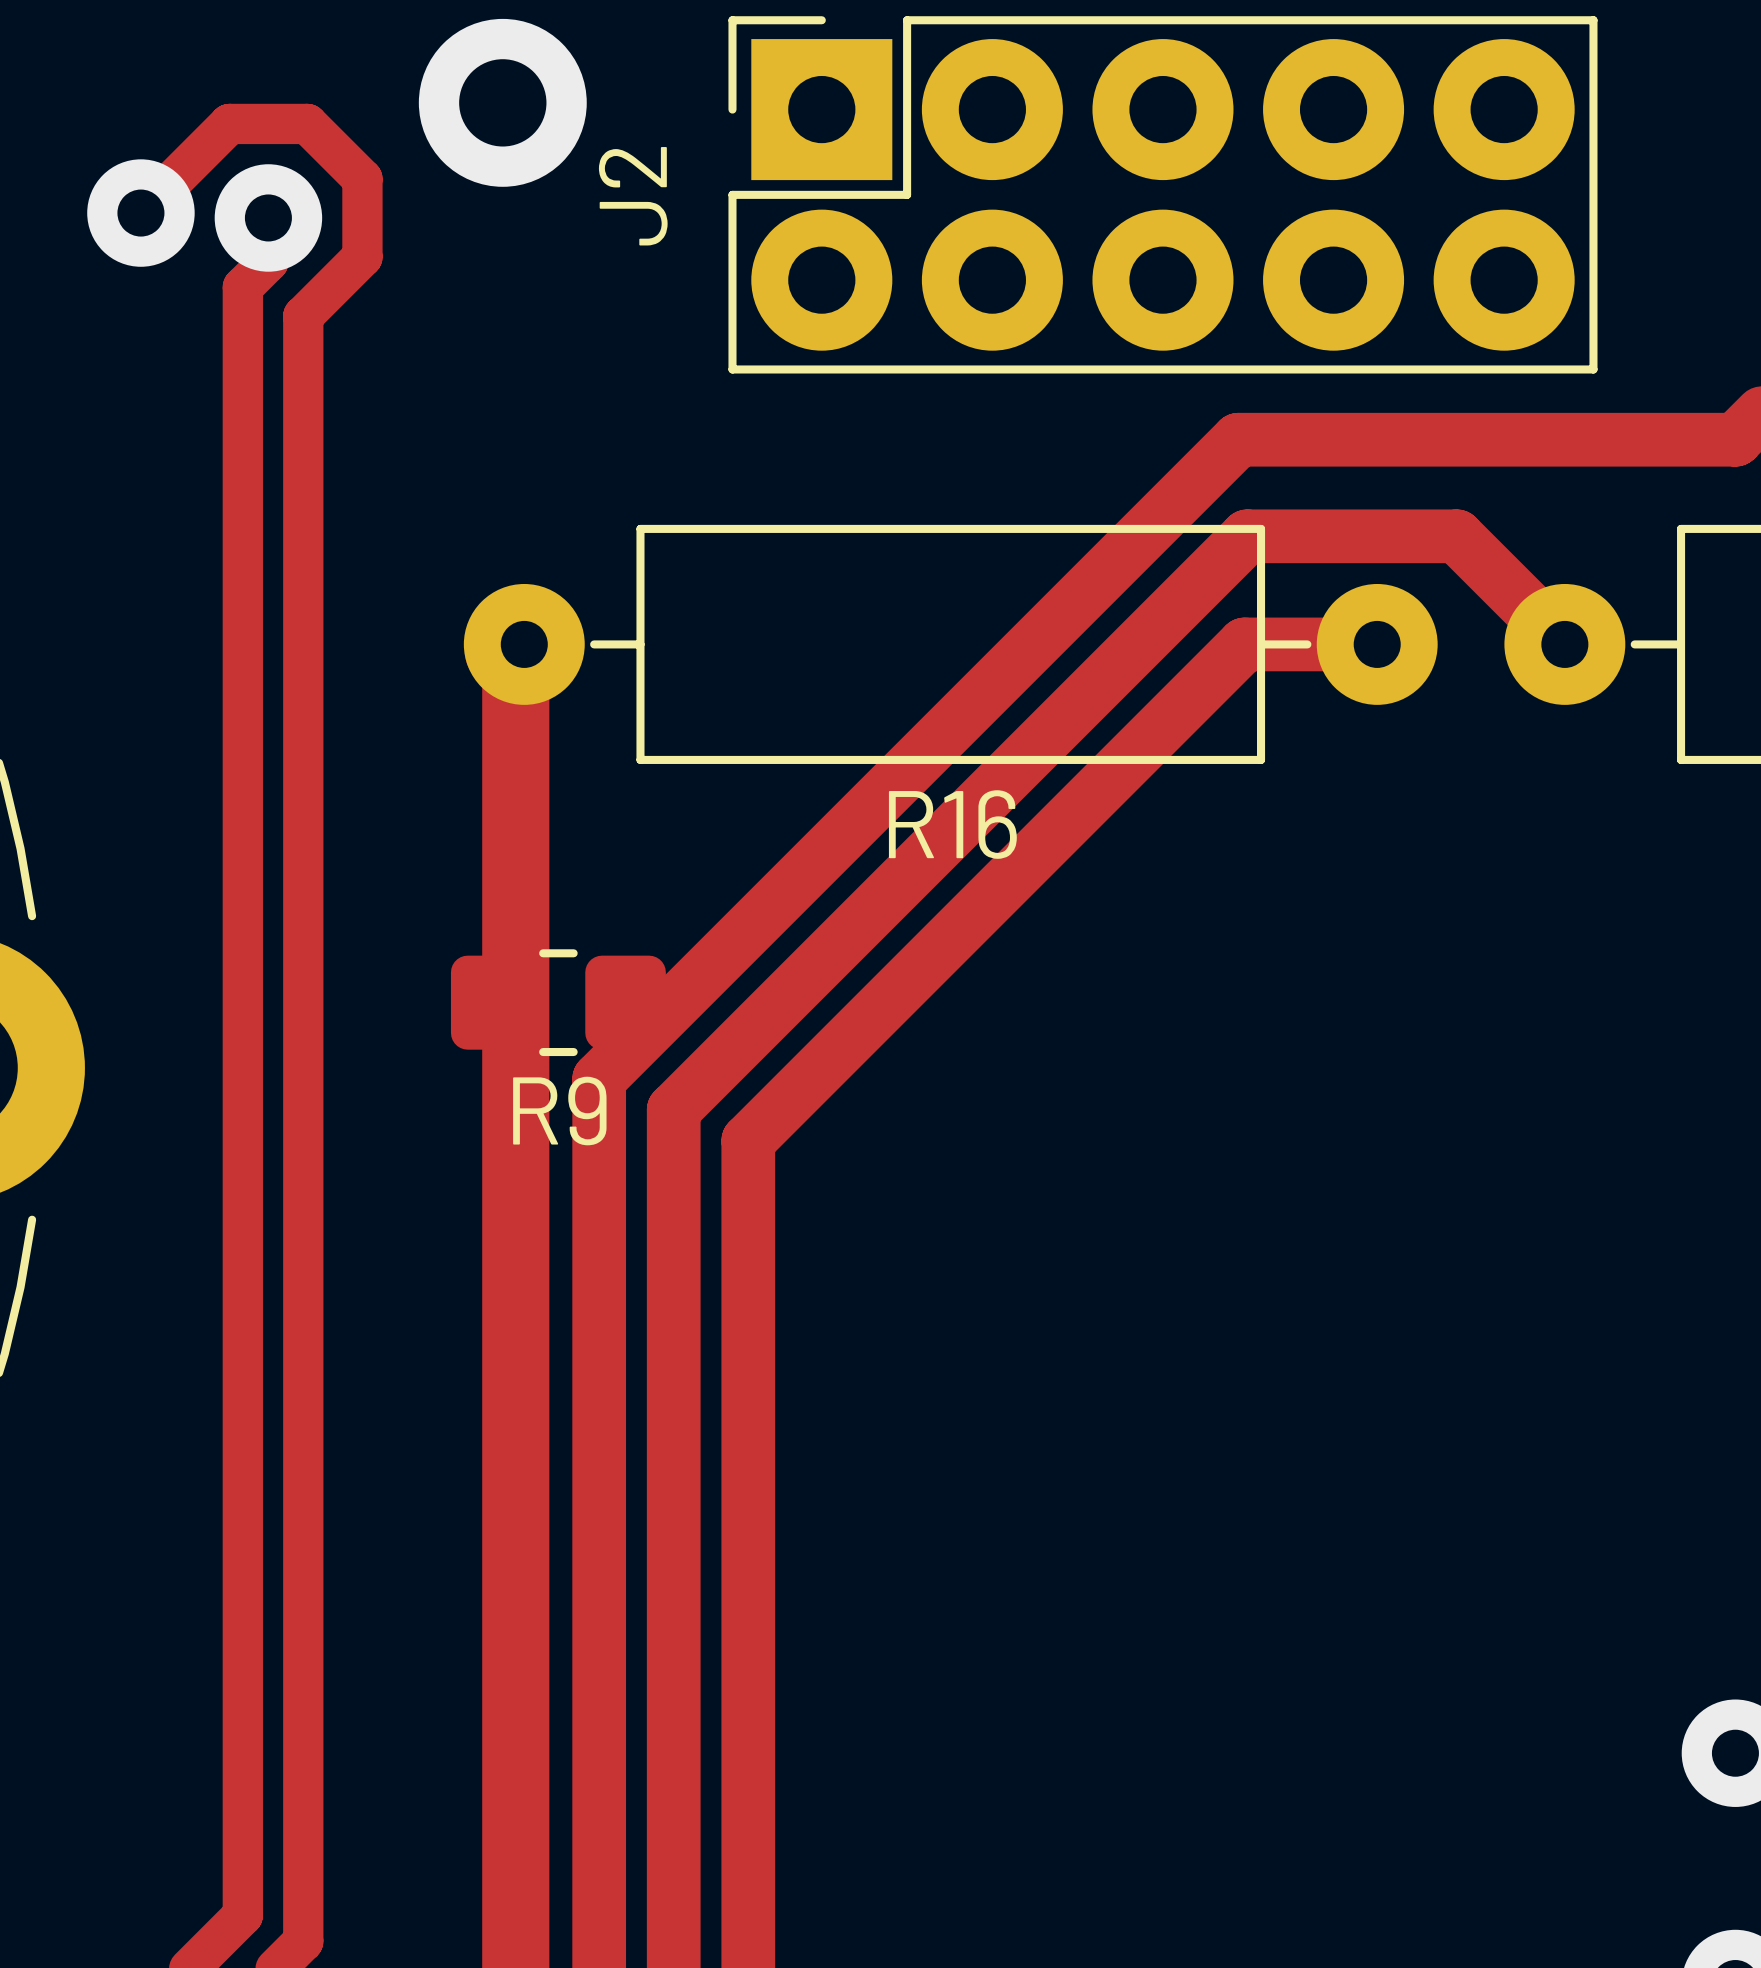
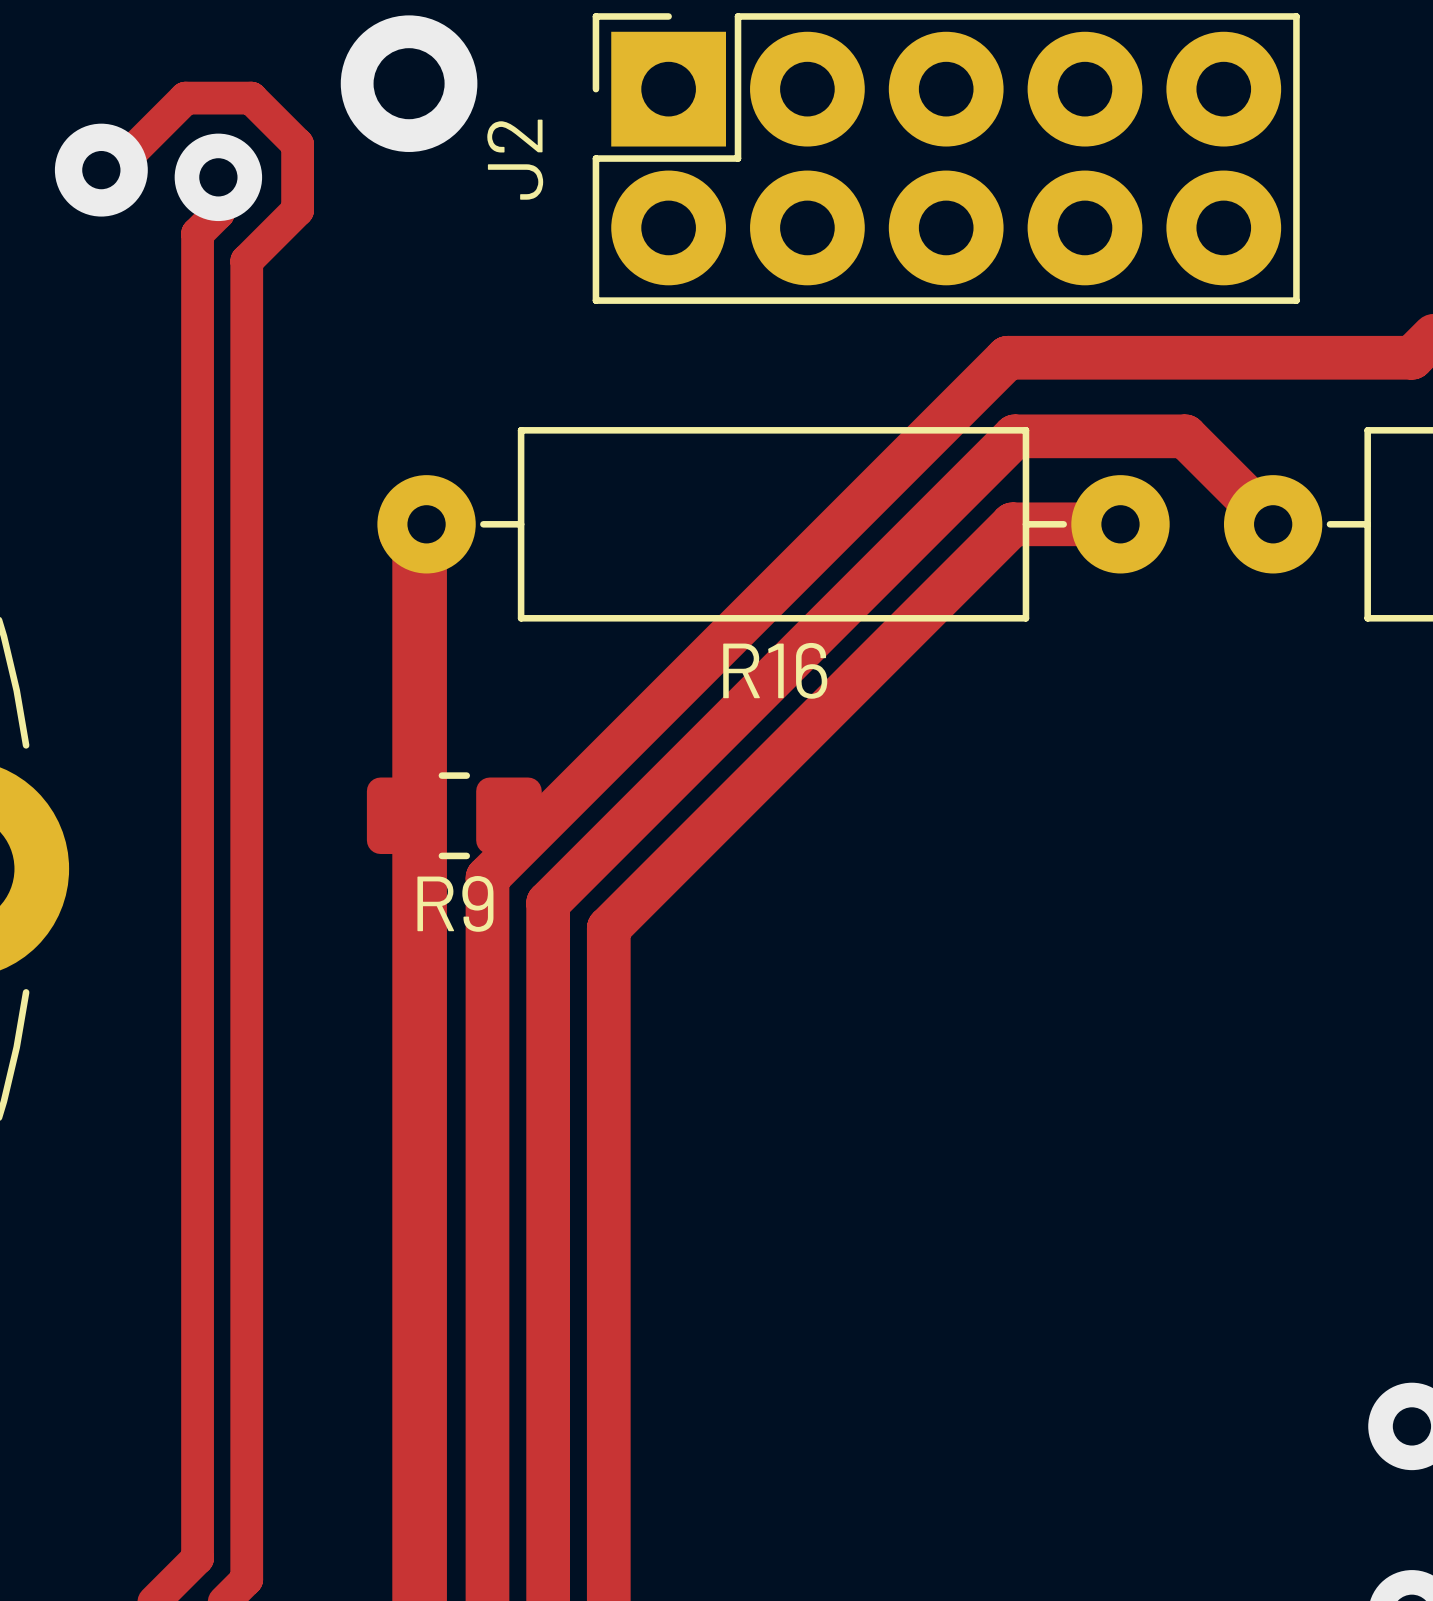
track: (140, 212) (229, 123) (307, 123) (362, 179) (362, 256) (303, 316) (303, 320) -> (101, 170) (113, 170) (185, 98) (251, 98) (297, 144) (297, 210) (246, 261)
via position: (140, 213) -> (101, 170)

